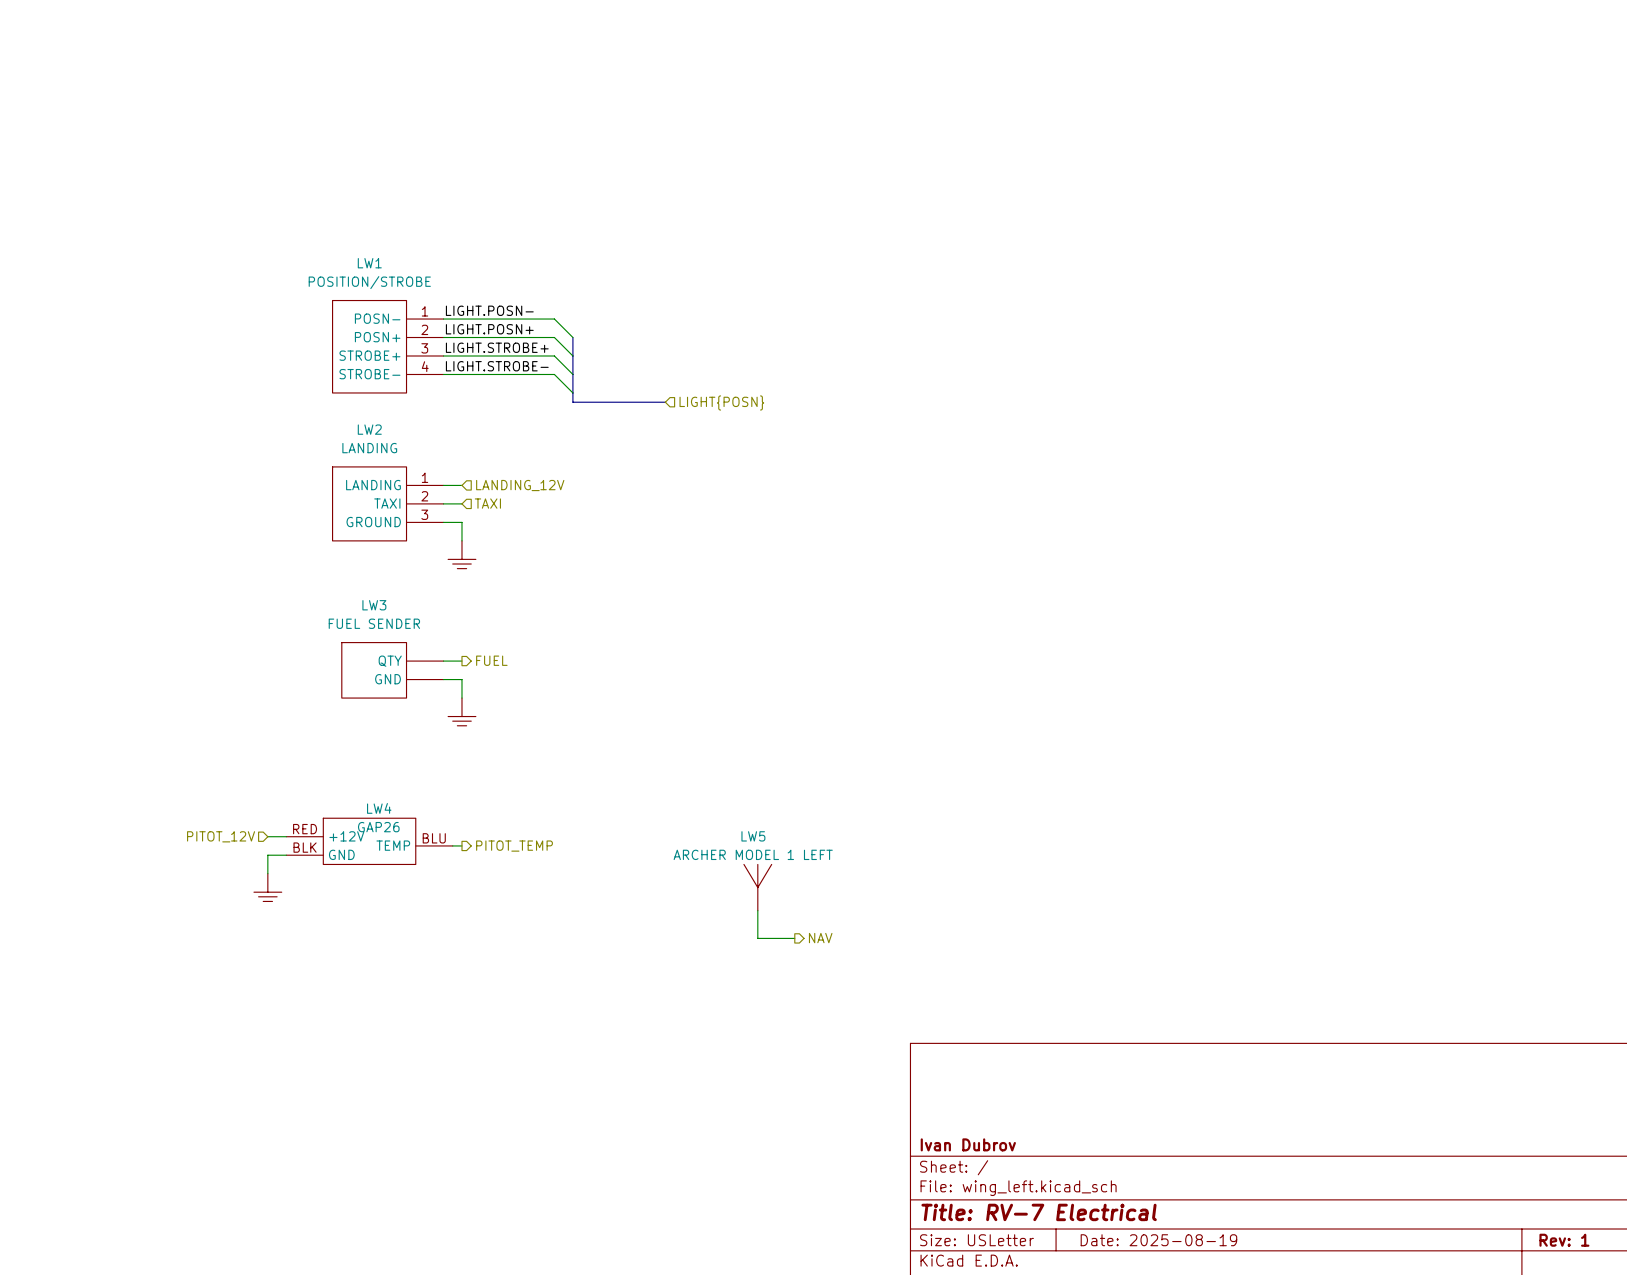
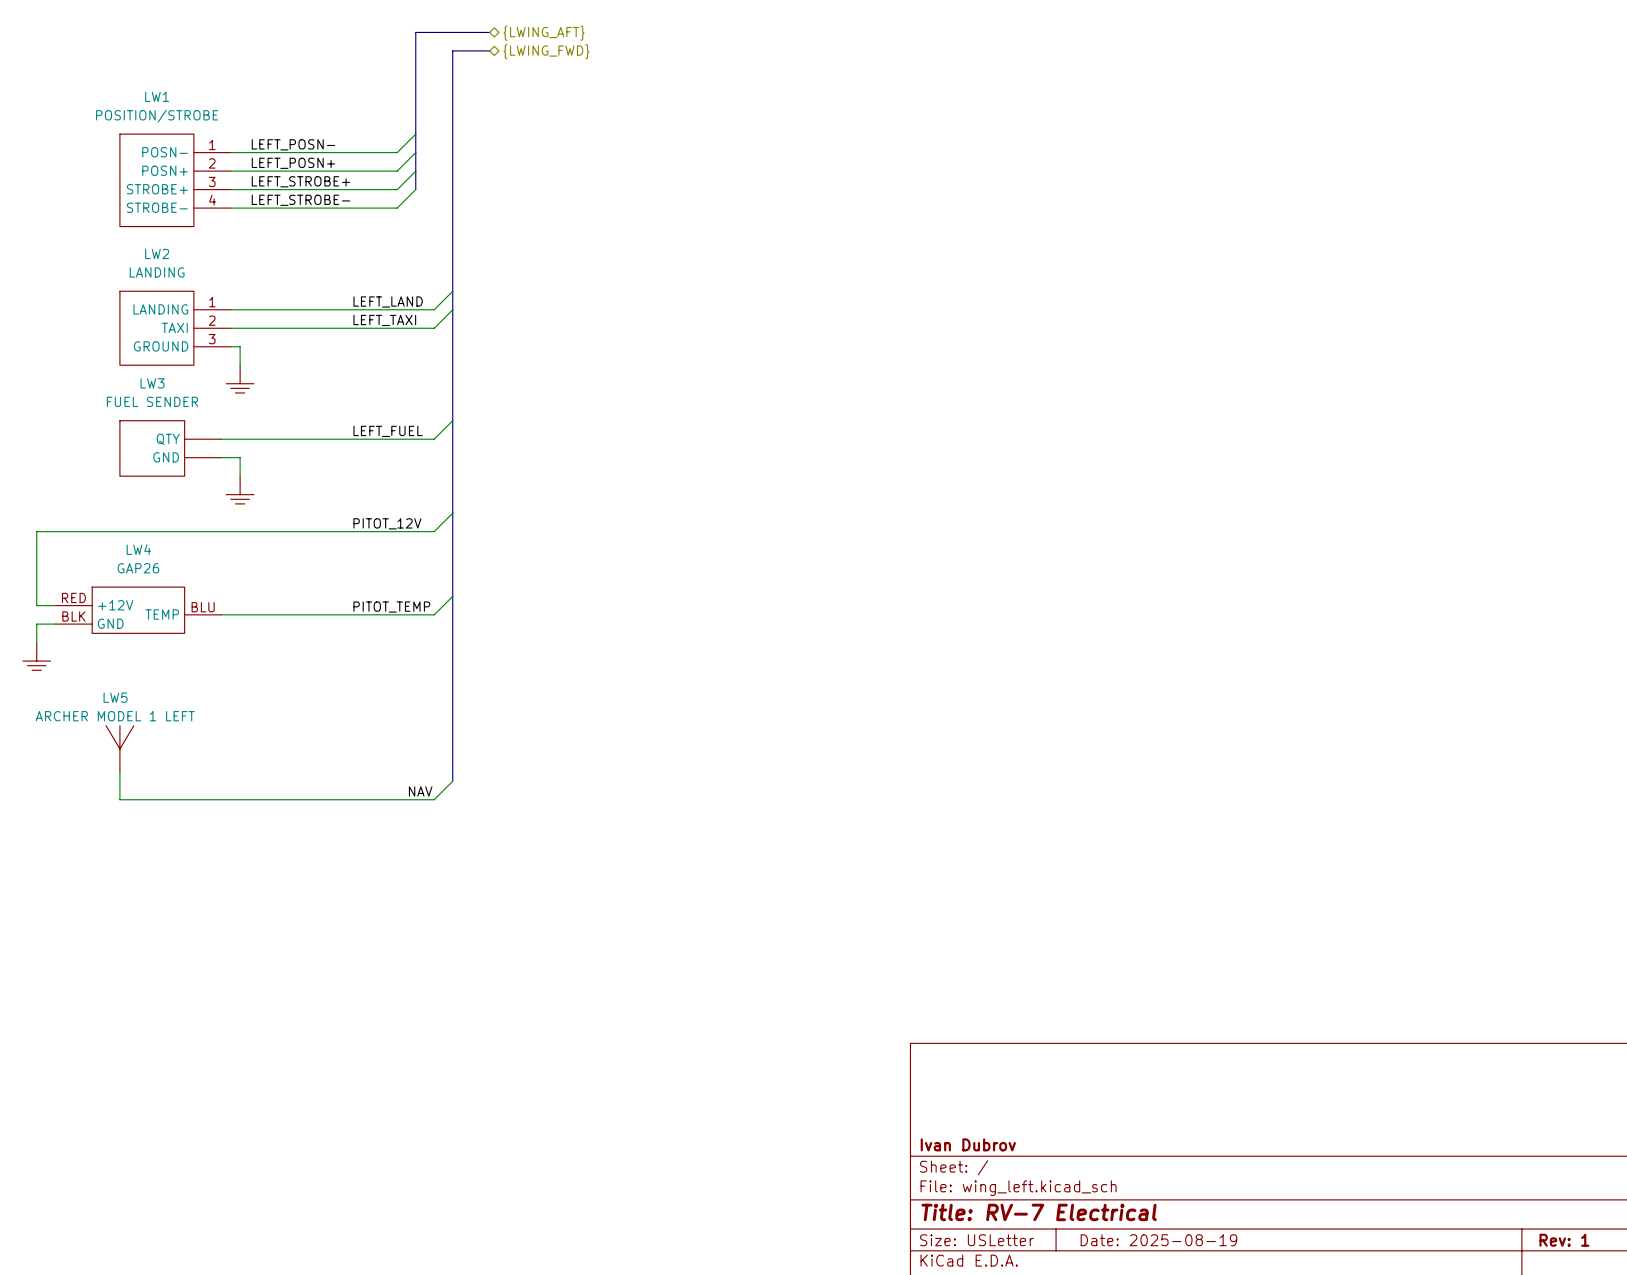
bus: none -> (489, 32) (415, 32) (415, 189)
hierarchical label: none -> {LWING_AFT} (544, 33)
bus: none -> (489, 50) (452, 50) (452, 781)
hierarchical label: none -> {LWING_FWD} (546, 51)
wire: none -> (415, 134) (397, 152) (230, 152)
label: none -> LEFT_POSN- (293, 144)
wire: none -> (415, 152) (397, 171) (230, 171)
label: none -> LEFT_POSN+ (293, 163)
wire: none -> (415, 171) (397, 189) (230, 189)
label: none -> LEFT_STROBE+ (300, 181)
wire: none -> (415, 189) (397, 208) (230, 208)
label: none -> LEFT_STROBE- (300, 200)
wire: none -> (452, 291) (434, 309) (230, 309)
label: none -> LEFT_LAND (388, 301)
wire: none -> (452, 309) (434, 328) (230, 328)
label: LIGHT.POSN- (489, 310) -> none
wire: (443, 319) (554, 319) (572, 337) -> none
label: none -> LEFT_TAXI (384, 320)
label: LIGHT.POSN+ (489, 329) -> none
wire: (443, 337) (554, 337) (572, 356) -> none
bus: (572, 337) (572, 402) (665, 402) -> none
wire: none -> (230, 346) (240, 346) (240, 365)
LW1 position: (388, 346) -> (175, 180)
label: LIGHT.STROBE+ (497, 347) -> none
wire: (443, 356) (554, 356) (572, 374) -> none
label: LIGHT.STROBE- (497, 366) -> none
wire: (443, 374) (554, 374) (572, 392) -> none
power symbol: none -> (240, 379)
hierarchical label: LIGHT{POSN} (721, 402) -> none
wire: none -> (452, 420) (434, 439) (221, 439)
label: none -> LEFT_FUEL (388, 431)
wire: none -> (221, 457) (240, 457) (240, 476)
wire: (443, 485) (461, 485) -> none
hierarchical label: LANDING_12V (520, 485) -> none
power symbol: none -> (240, 490)
LW2 position: (388, 503) -> (175, 328)
wire: (443, 503) (461, 503) -> none
hierarchical label: TAXI (487, 503) -> none
wire: none -> (452, 513) (434, 531) (36, 531) (36, 605) (55, 605)
wire: (443, 522) (461, 522) (461, 540) -> none
label: none -> PITOT_12V (387, 523)
power symbol: (461, 554) -> none
wire: none -> (452, 596) (434, 614) (221, 614)
label: none -> PITOT_TEMP (391, 607)
wire: none -> (55, 624) (36, 624) (36, 642)
power symbol: none -> (36, 656)
hierarchical label: FUEL (491, 660) -> none
wire: (443, 661) (461, 661) -> none
LW3 position: (392, 670) -> (170, 448)
wire: (443, 679) (461, 679) (461, 698) -> none
power symbol: (461, 711) -> none
wire: none -> (119, 772) (119, 799) (434, 799) (452, 781)
label: none -> NAV (420, 791)
LW4 name position: LW4 (379, 808) -> LW4 (138, 549)
LW4 value position: GAP26 (378, 827) -> GAP26 (138, 568)
hierarchical label: PITOT_12V (221, 836) -> none
wire: (267, 836) (286, 836) -> none
LW4 position: (369, 841) -> (138, 610)
wire: (452, 845) (461, 845) -> none
hierarchical label: PITOT_TEMP (514, 846) -> none
wire: (286, 855) (267, 855) (267, 873) -> none
power symbol: (267, 887) -> none
LW5 position: (757, 887) -> (119, 748)
wire: (757, 910) (757, 938) (794, 938) -> none
hierarchical label: NAV (820, 938) -> none

